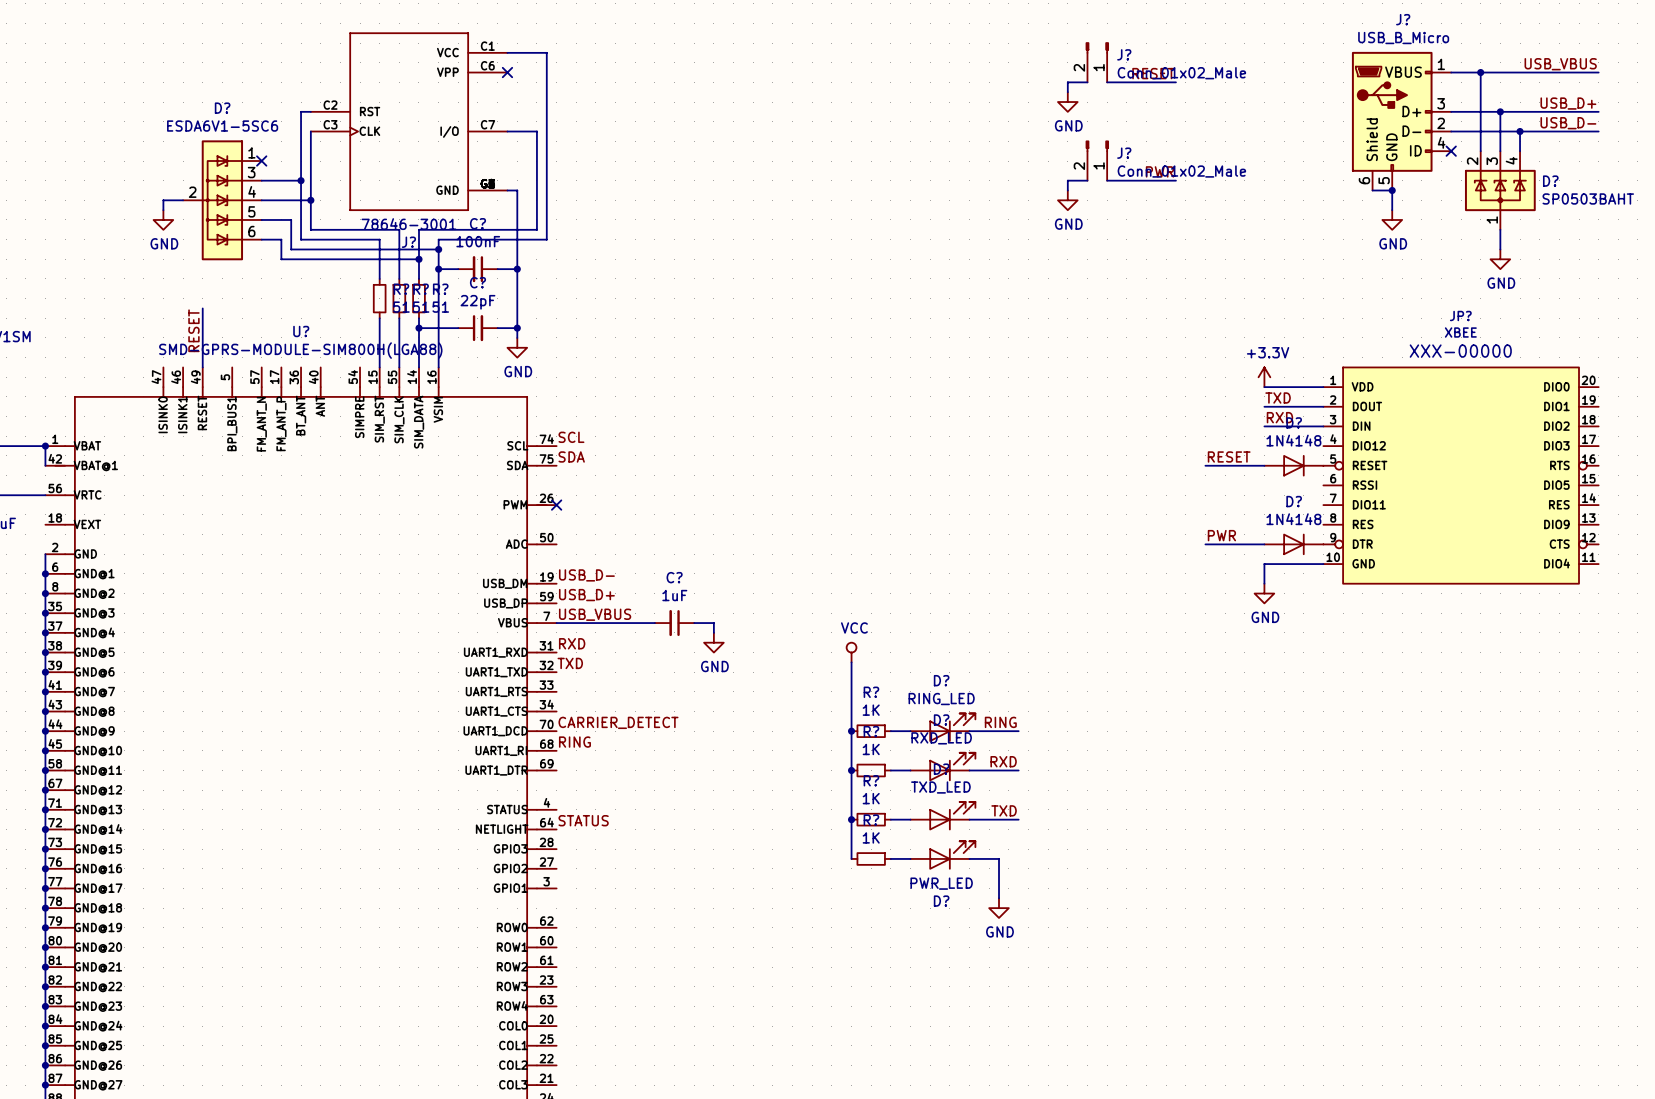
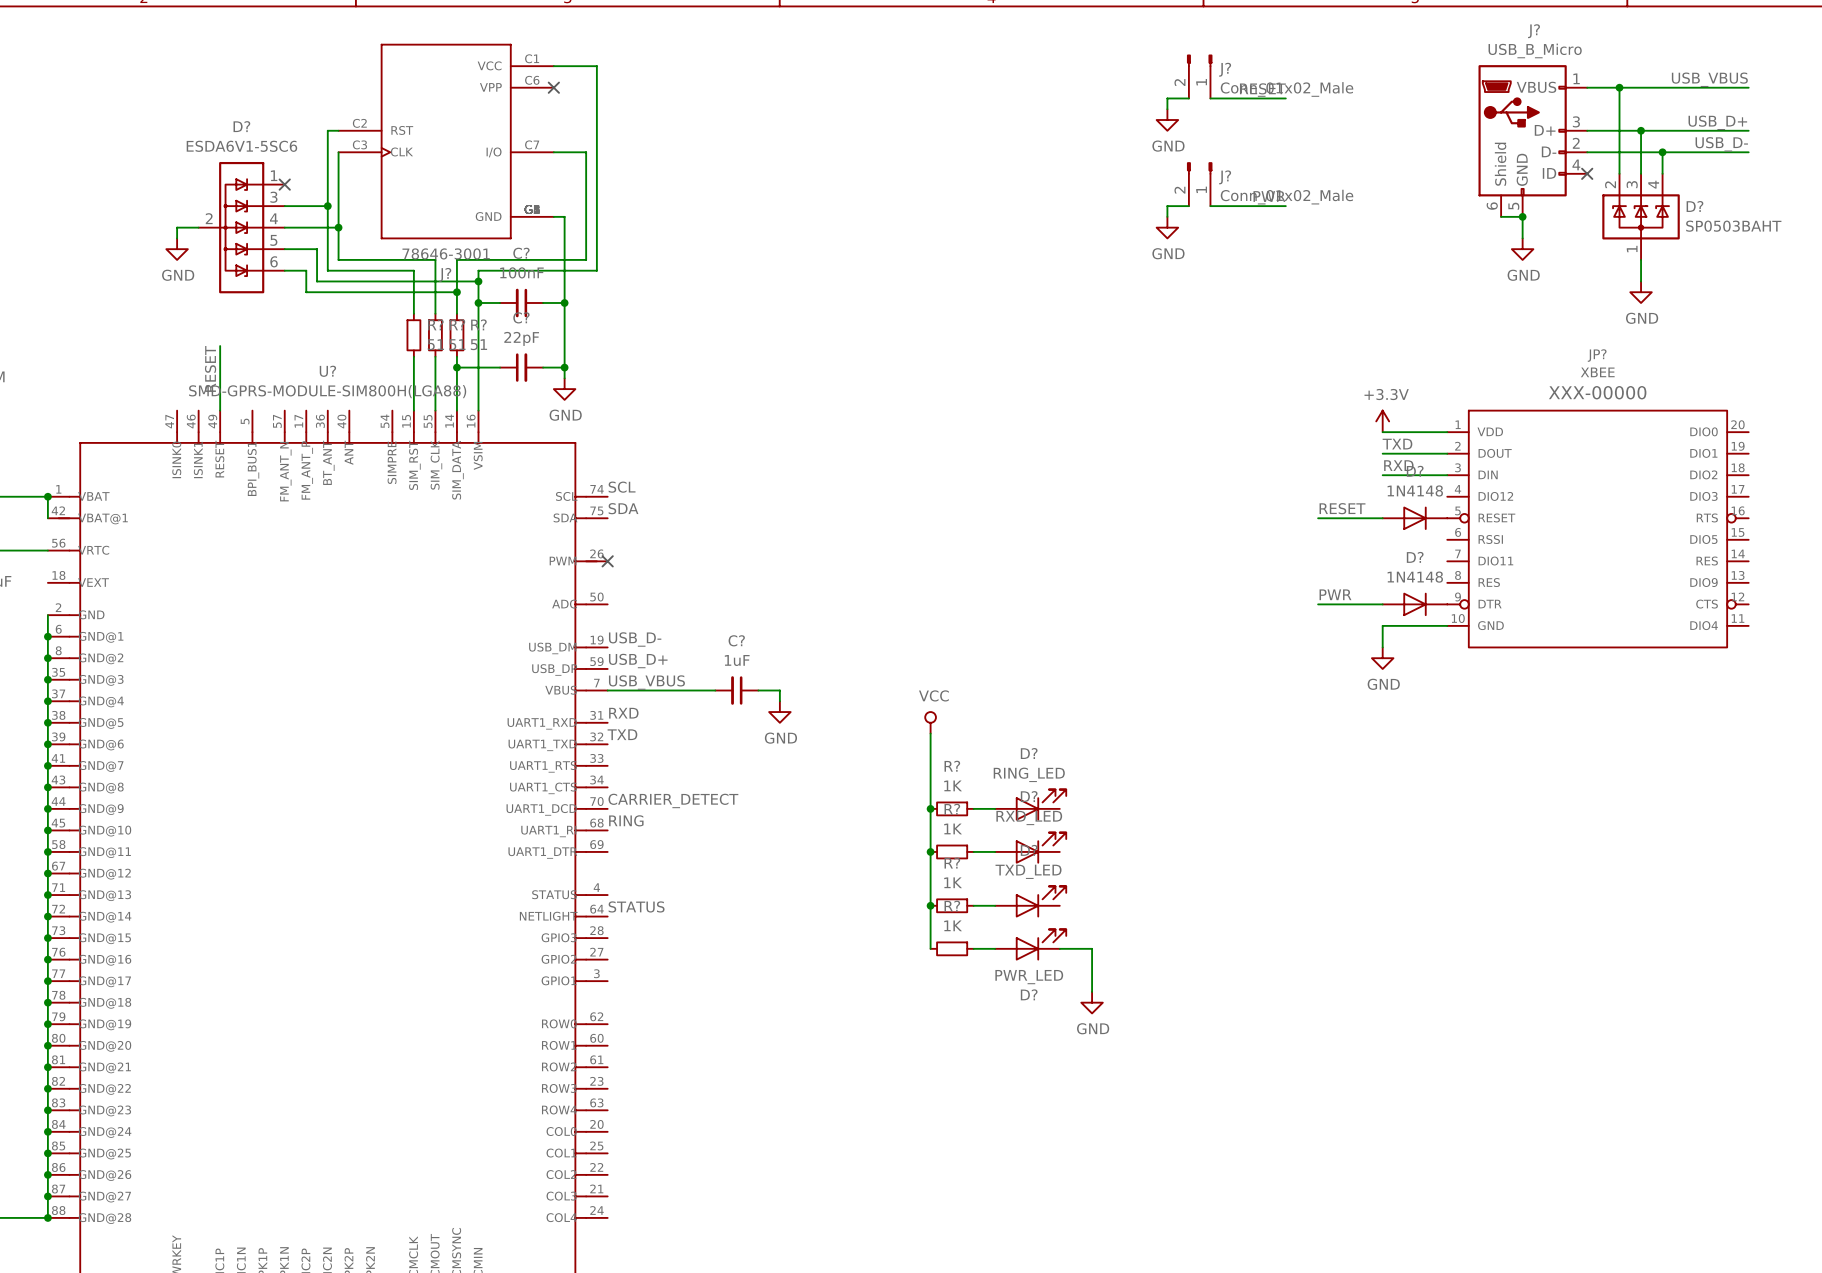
label: RING (1000, 722) -> none
wire: (969, 731) (1018, 731) -> none
label: RXD (1003, 761) -> none
wire: (969, 770) (1018, 770) -> none
label: TXD (1004, 810) -> none
wire: (969, 819) (1018, 819) -> none

